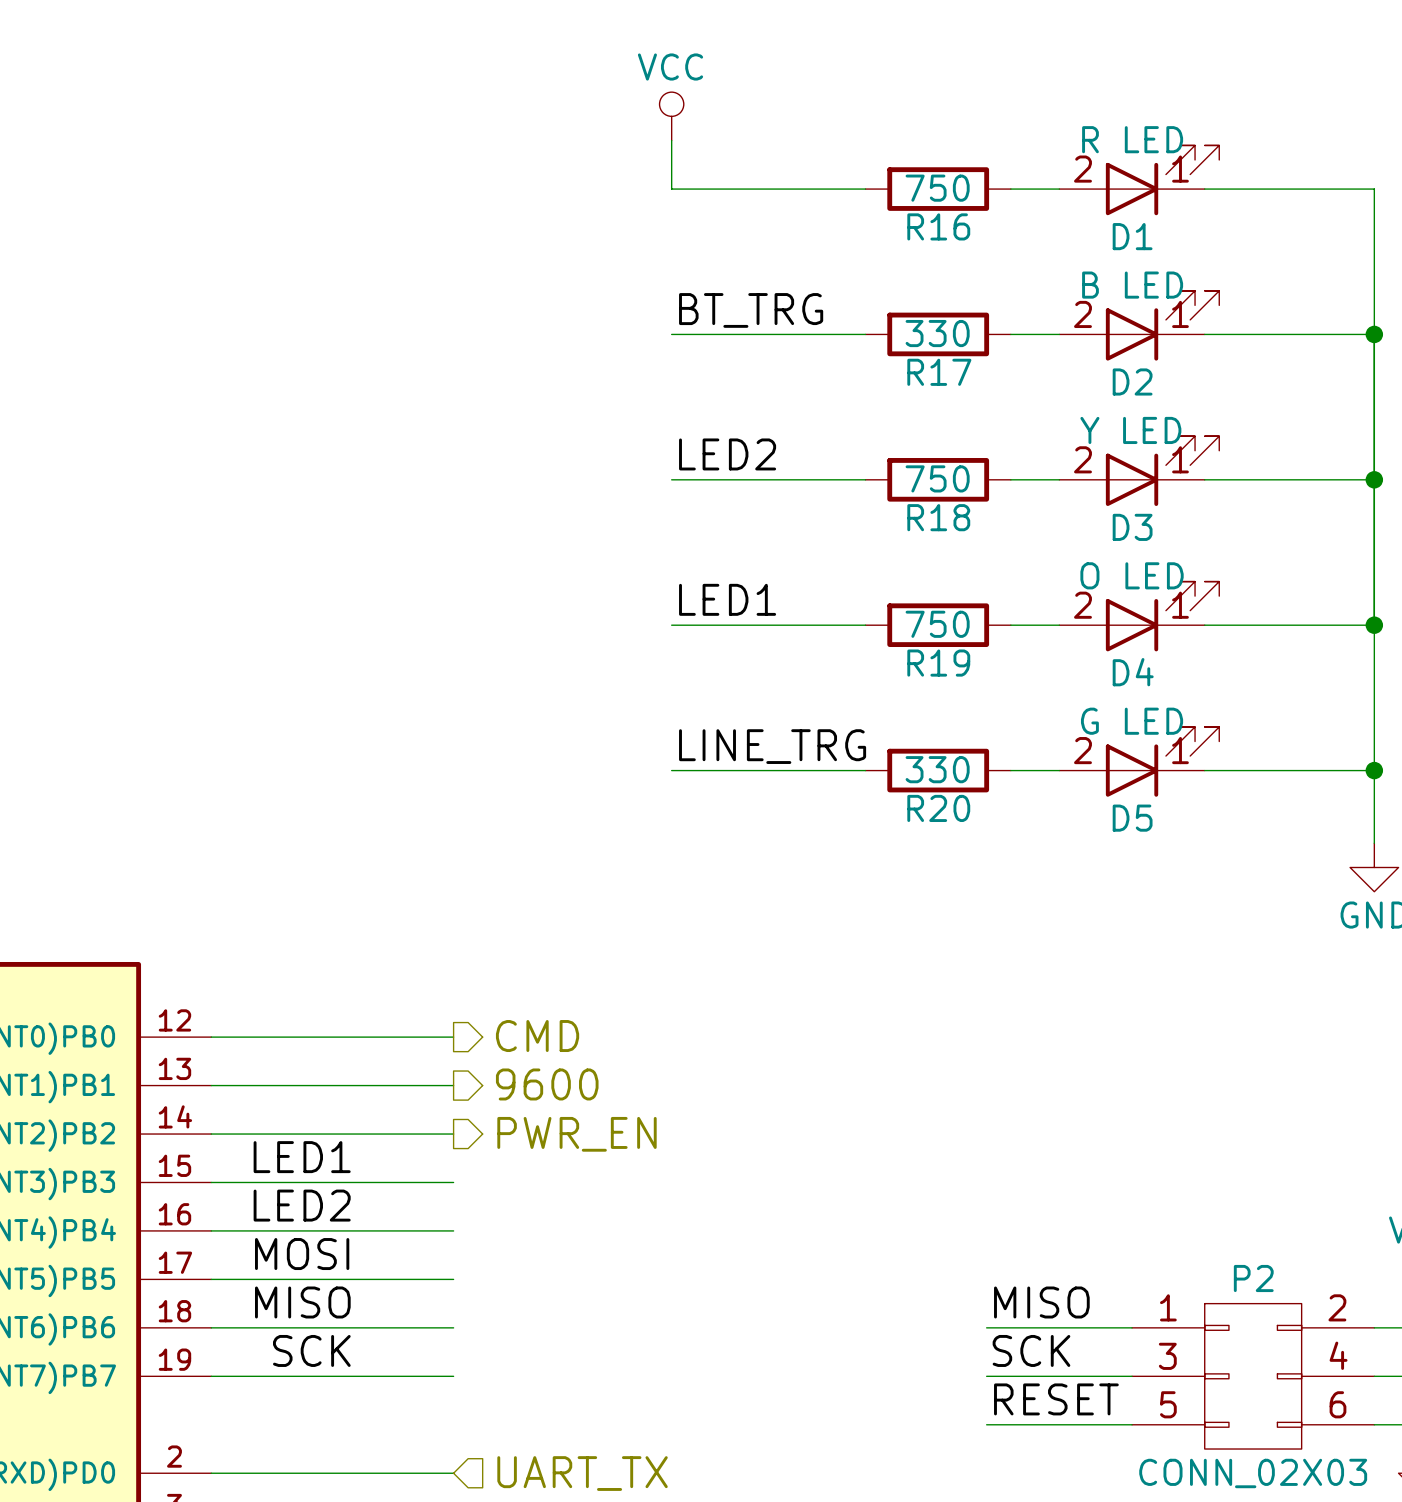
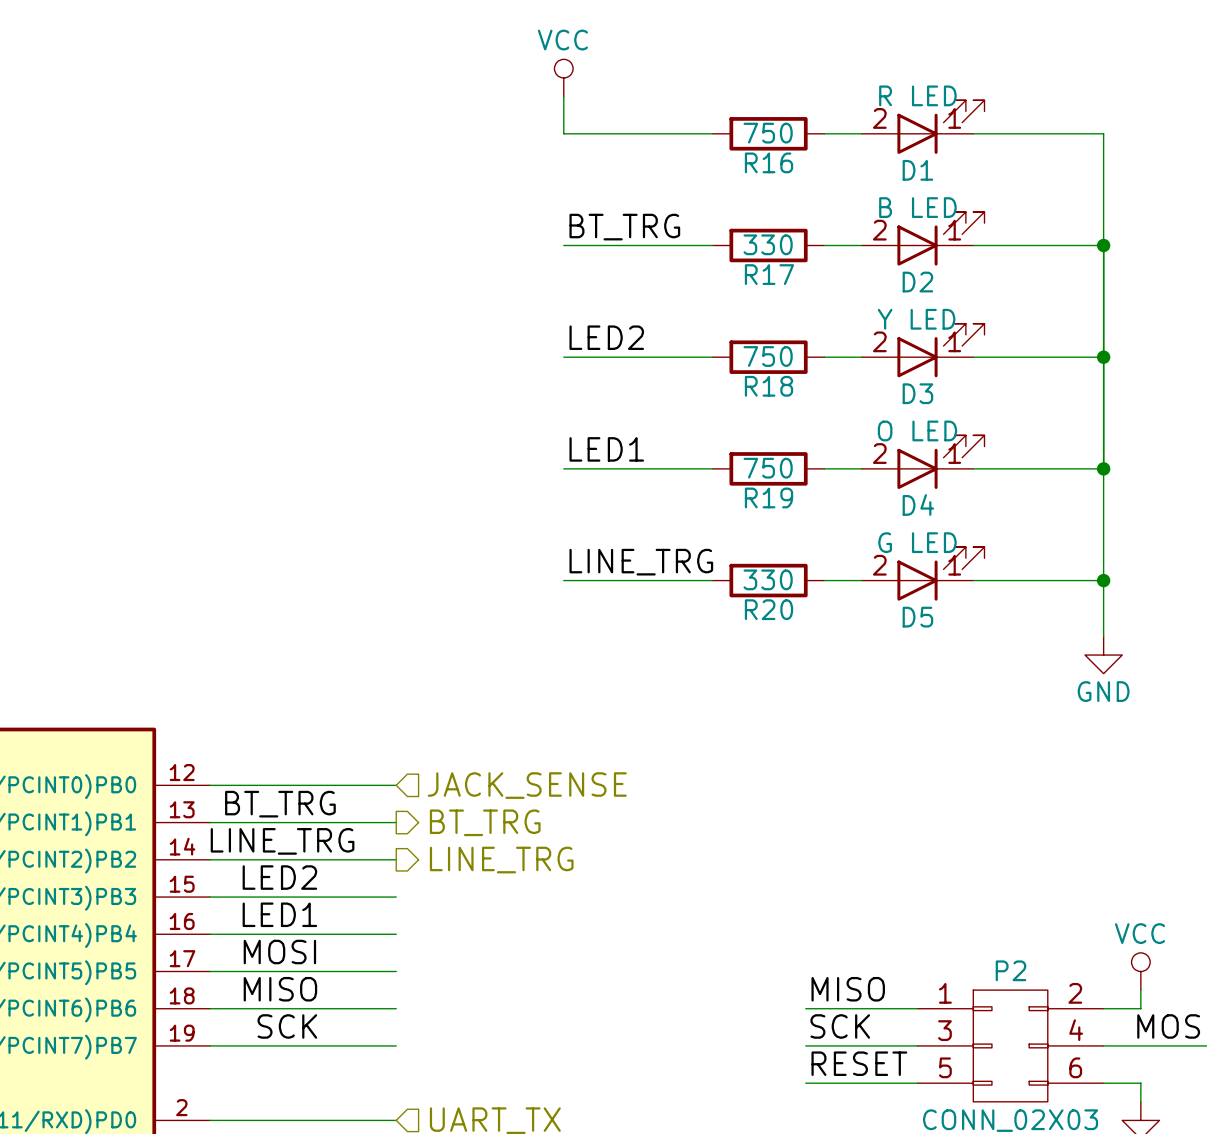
hierarchical label shape: output (537, 1036) -> input (527, 785)
hierarchical label: CMD (537, 1036) -> JACK_SENSE (527, 785)
label: none -> BT_TRG (280, 804)
hierarchical label: 9600 (547, 1084) -> BT_TRG (485, 822)
label: none -> LINE_TRG (282, 841)
hierarchical label: PWR_EN (577, 1134) -> LINE_TRG (501, 860)
label: LED1 (302, 1157) -> LED2 (279, 877)
label: LED2 (302, 1205) -> LED1 (279, 914)

